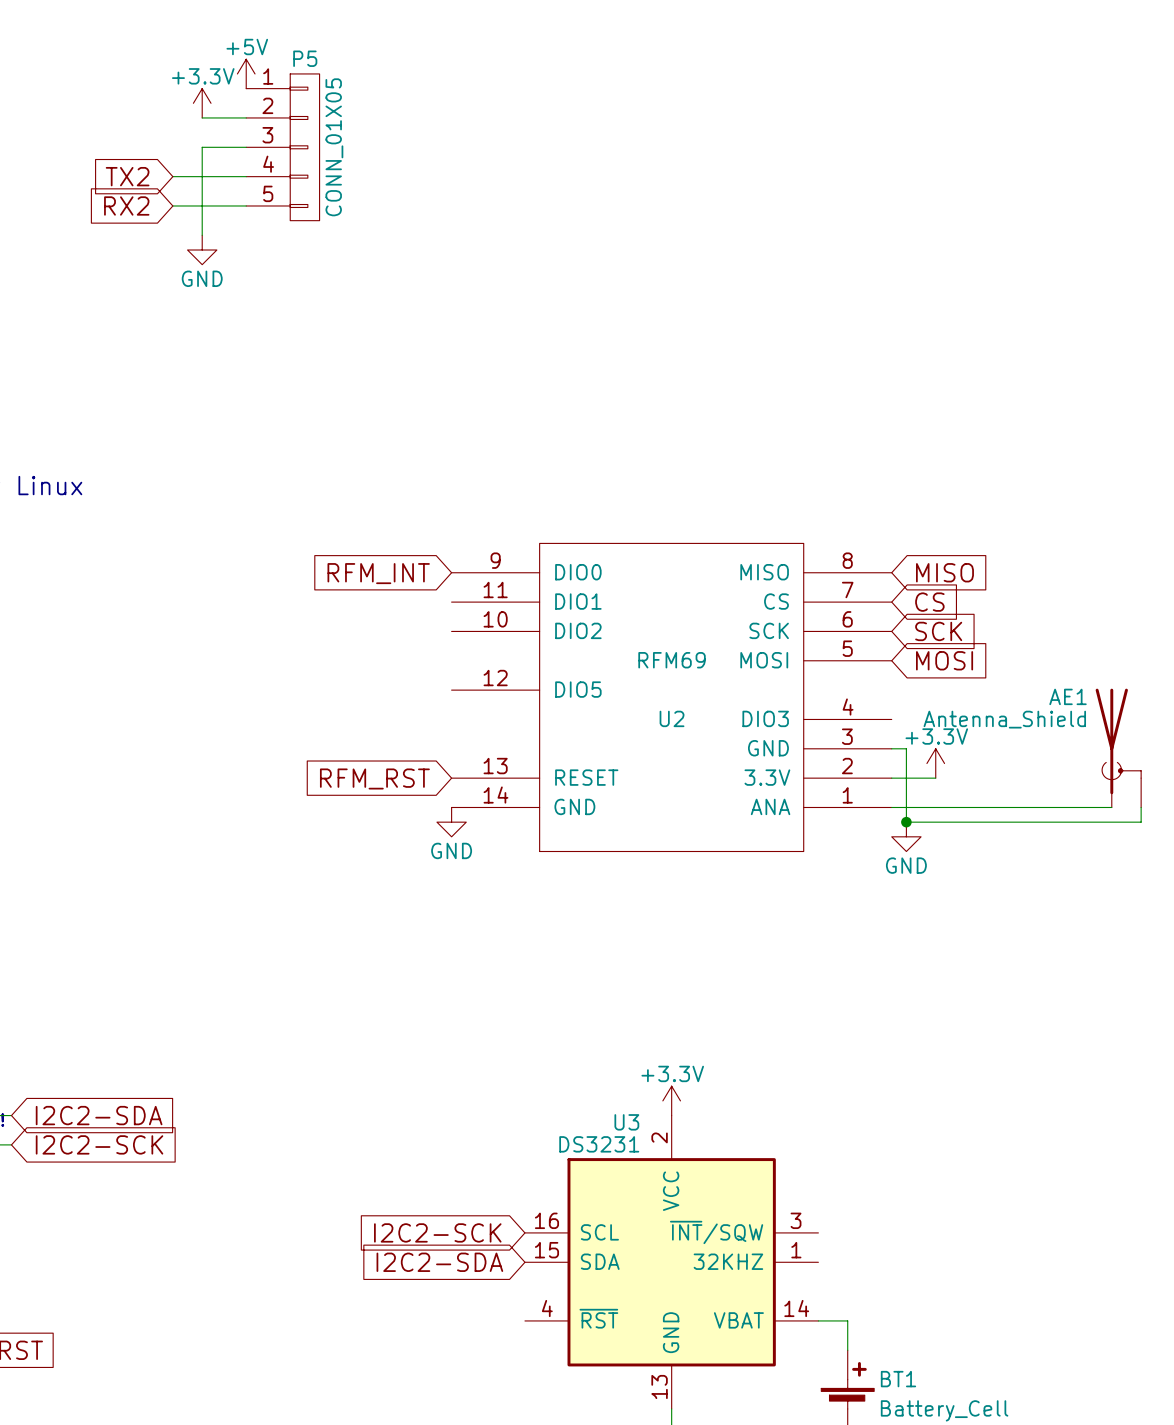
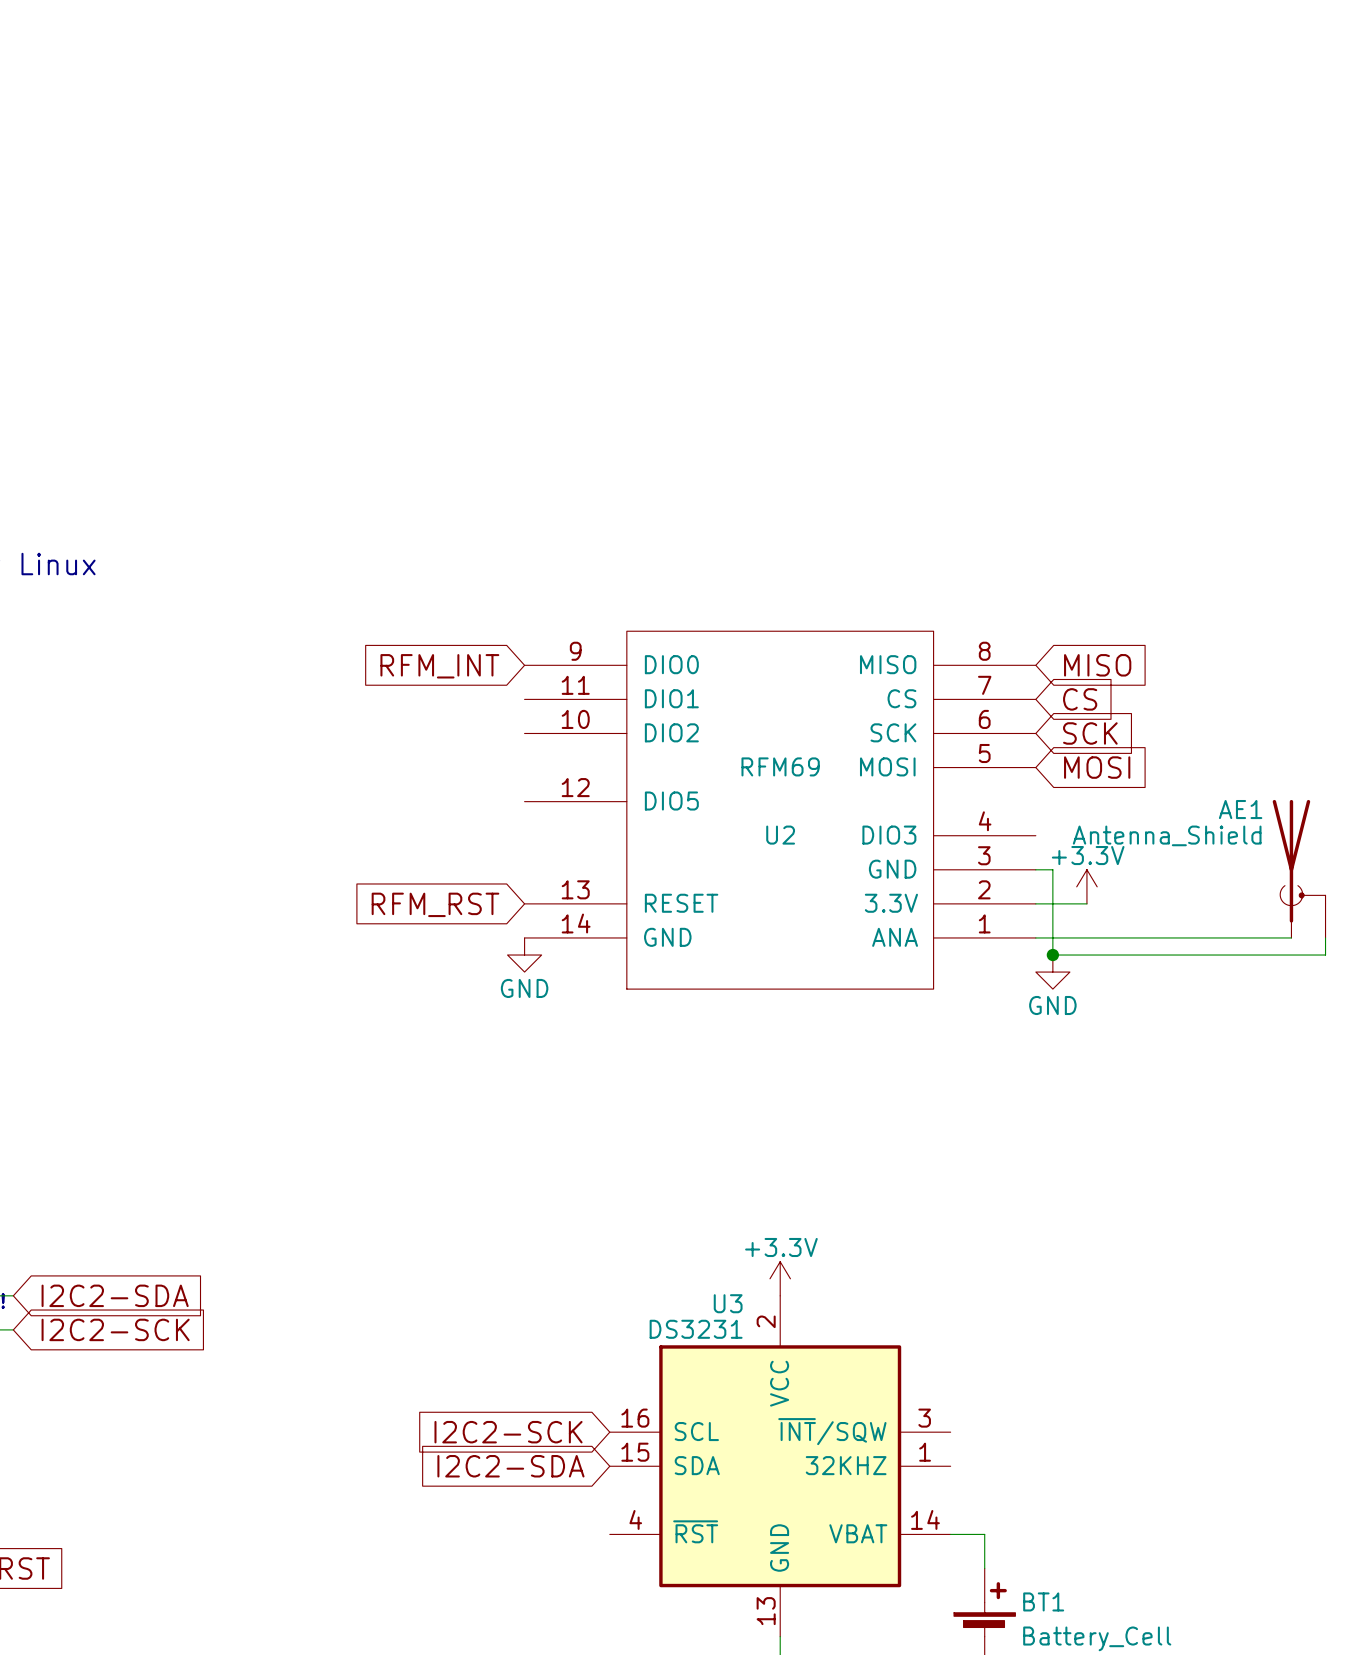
power symbol: +5V (246, 73) -> none
power symbol: +3.3V (202, 103) -> none
wire: (202, 117) (246, 117) -> none
wire: (246, 147) (202, 147) (202, 235) -> none
P5: CONN_01X05 (282, 147) -> none
global label: TX2 (127, 176) -> none
wire: (172, 176) (246, 176) -> none
global label: RX2 (126, 205) -> none
wire: (172, 205) (246, 205) -> none
power symbol: GND (202, 250) -> none

